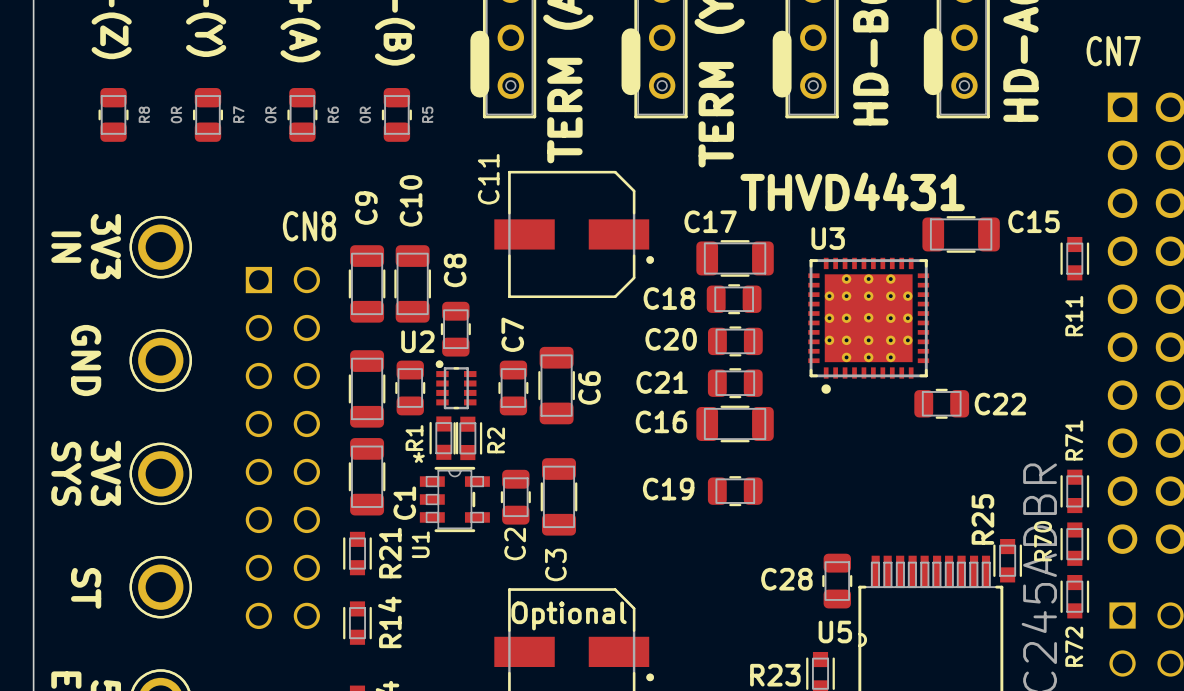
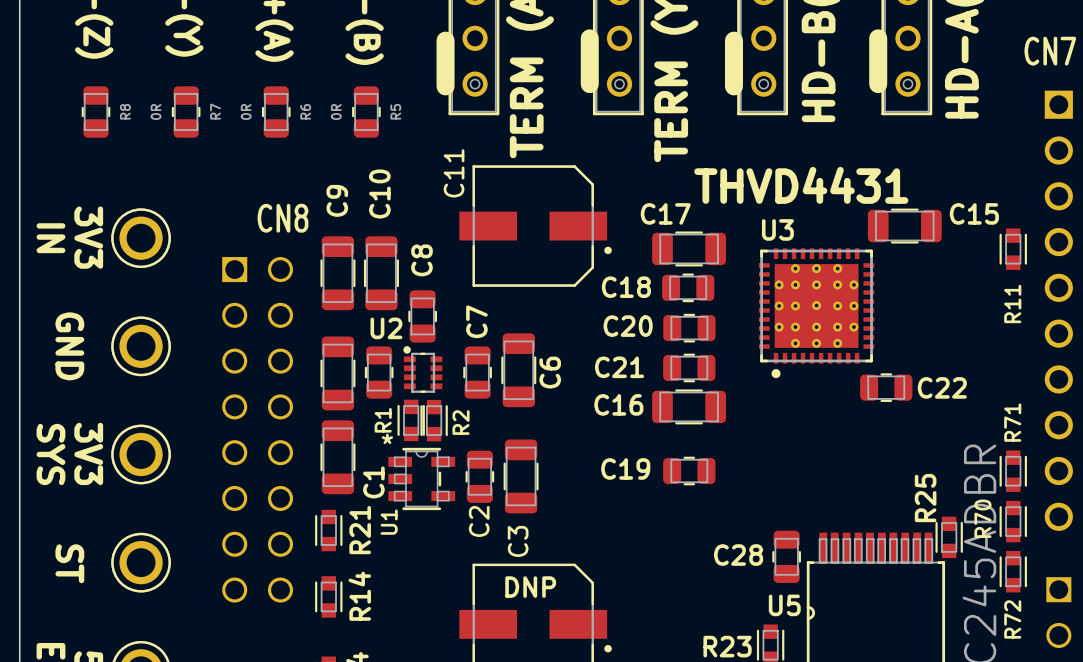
part text: Optional (569, 615) -> DNP (530, 587)

